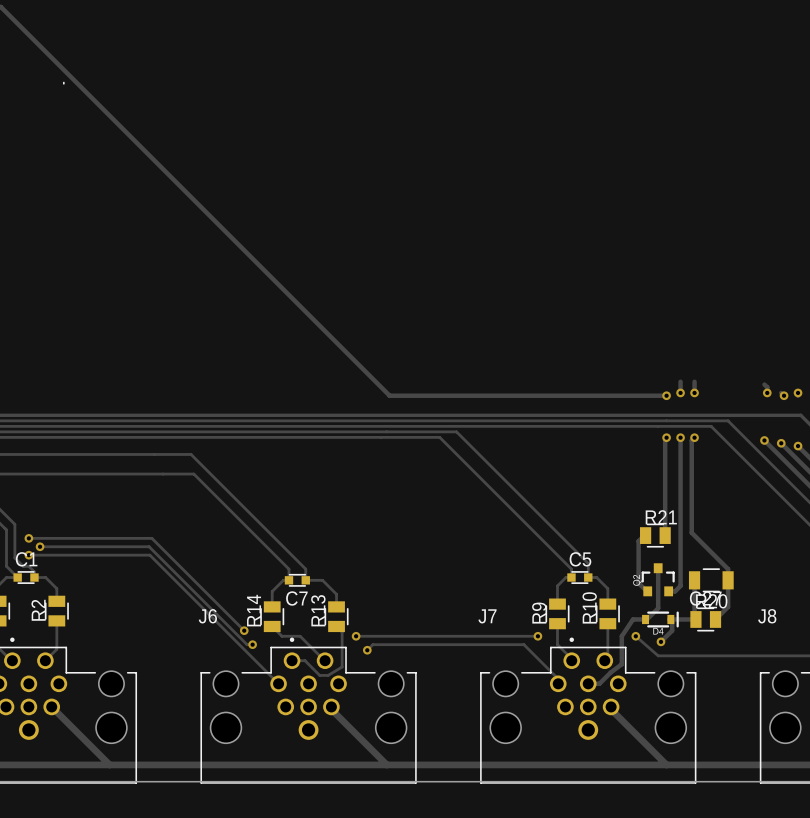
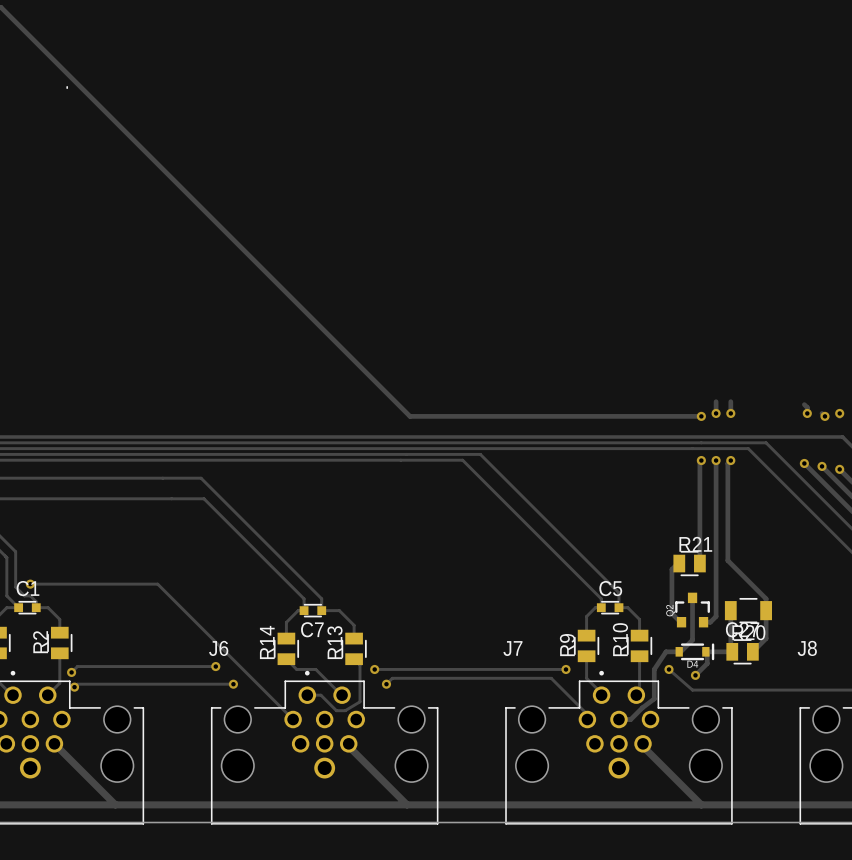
track: (28, 538) (151, 538) (244, 630) -> none
via: (28, 538) -> none
track: (40, 546) (149, 546) (247, 644) (252, 644) -> none
via: (40, 546) -> none
via: (244, 630) -> none
track: none -> (215, 666) (77, 666) (71, 672)
via: none -> (215, 666)
via: none -> (71, 672)
via: (252, 644) -> none
track: none -> (233, 684) (77, 684) (74, 687)
via: none -> (233, 684)
via: none -> (74, 687)

